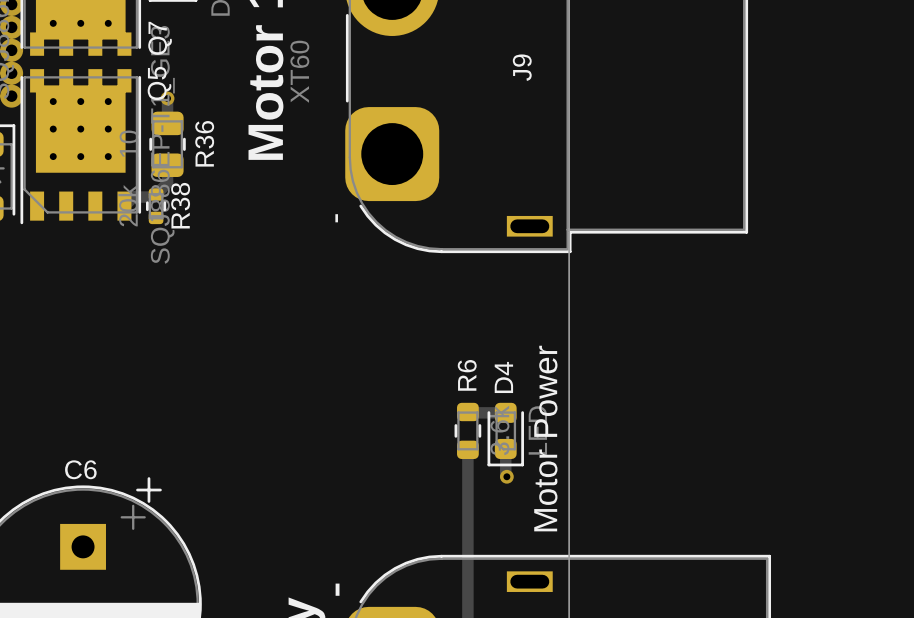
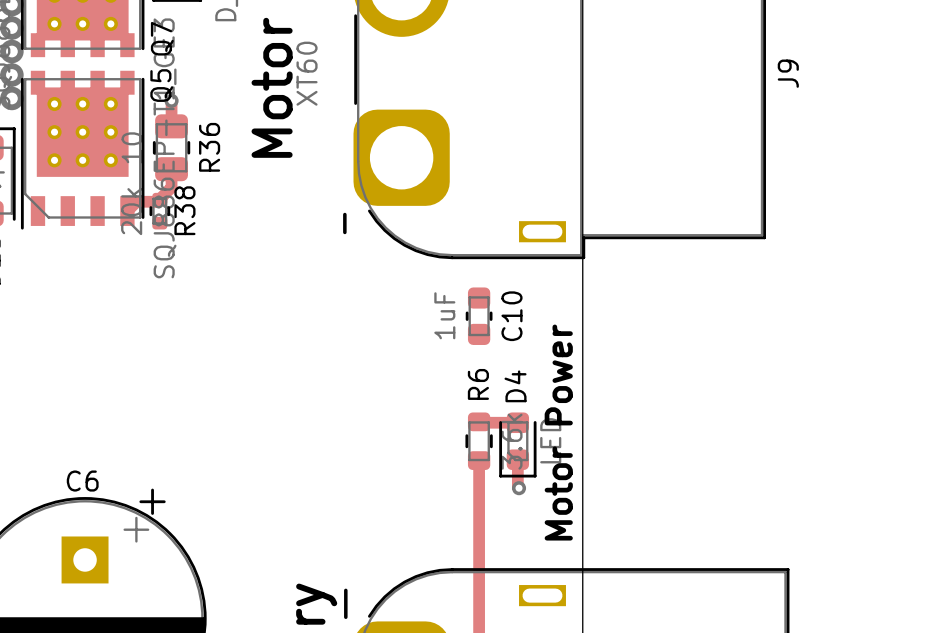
J9 name position: J9 (522, 67) -> J9 (788, 73)
C10: none -> 1uF (479, 316)

